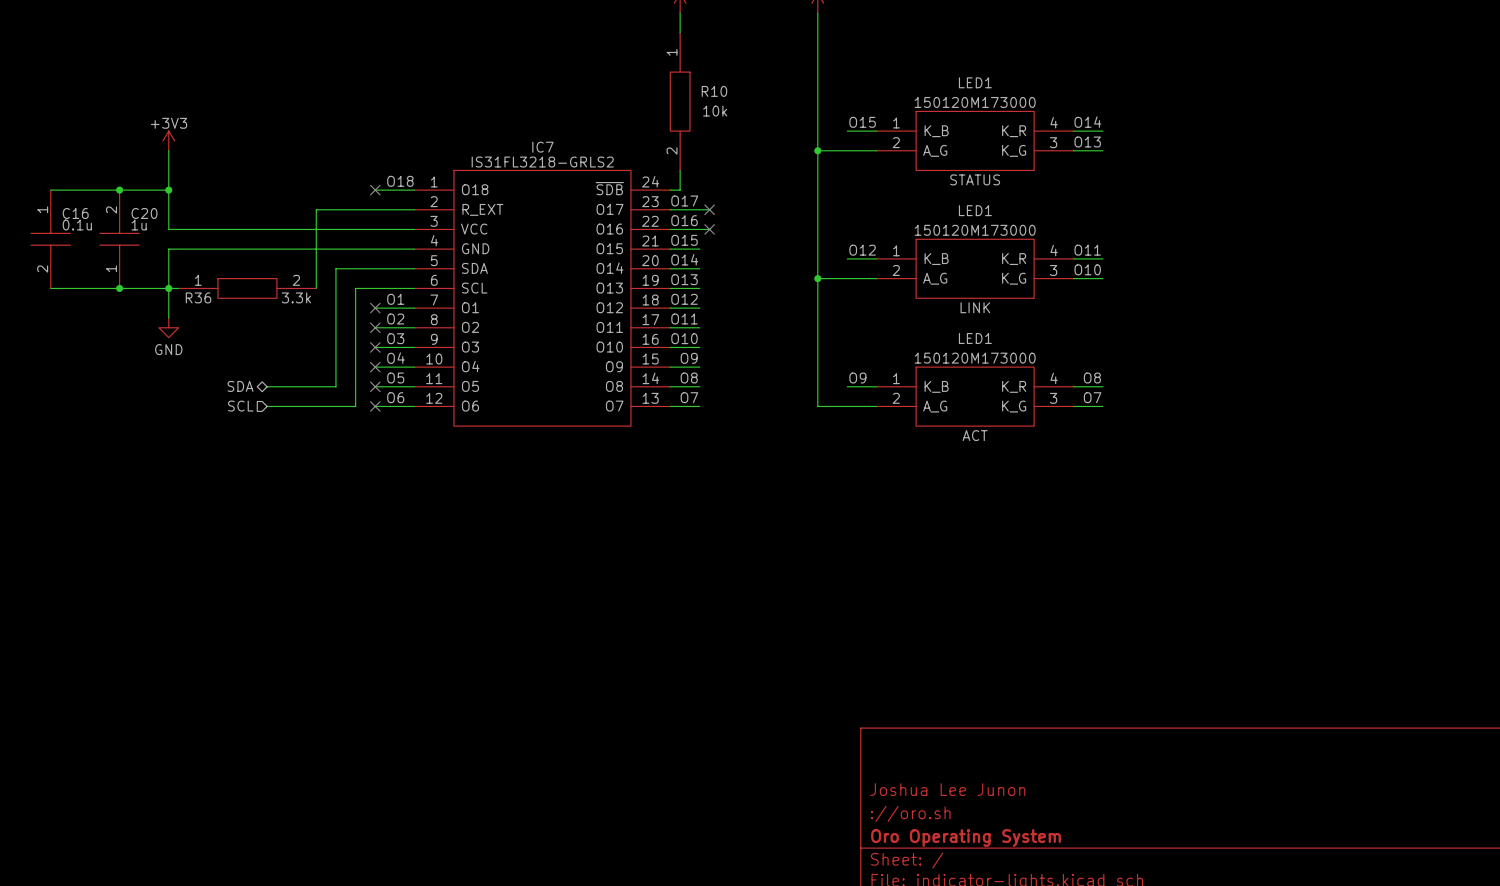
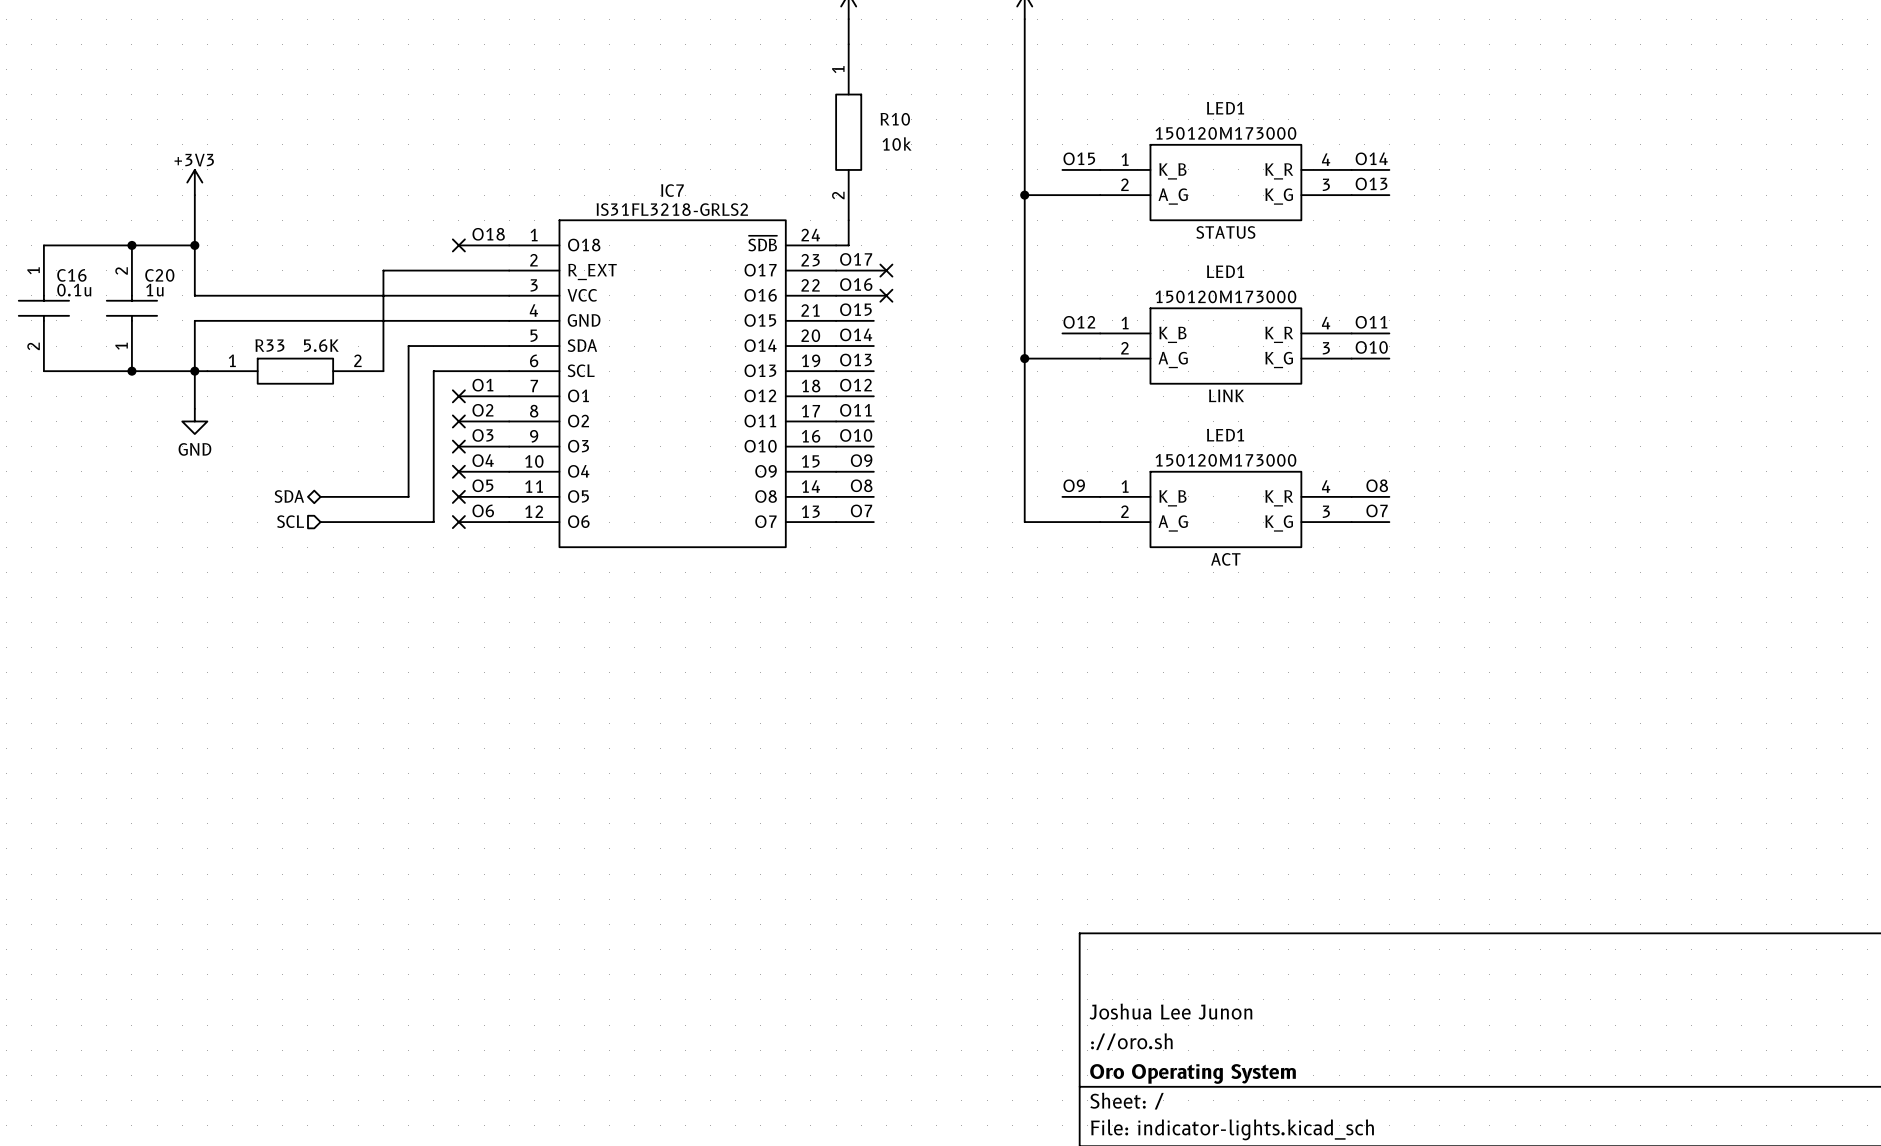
R36 name: R36 (198, 297) -> R33 (269, 345)
R36 value: 3.3k (296, 297) -> 5.6K (321, 345)

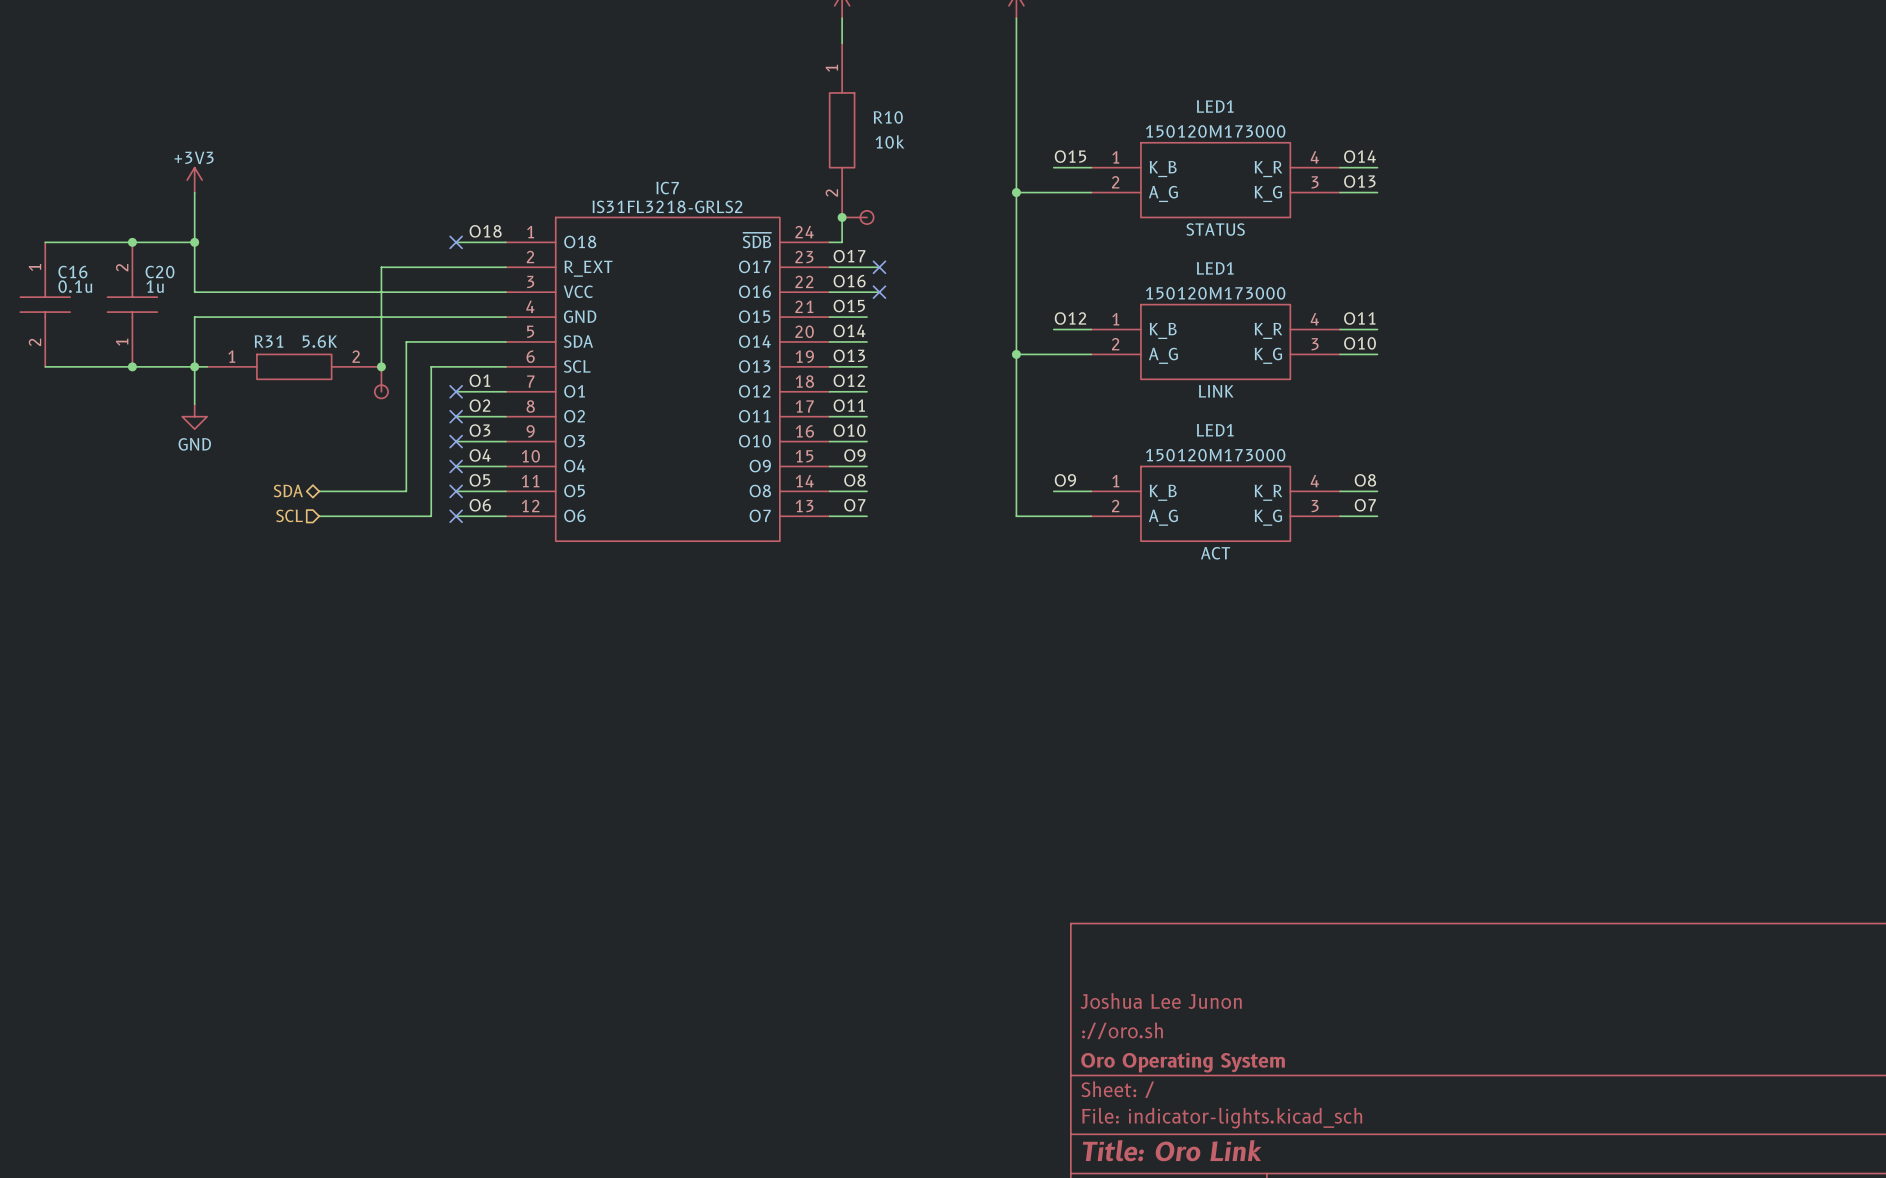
junction: none -> (842, 217)
part: none -> (857, 217)
R33 name: R33 (269, 345) -> R31 (268, 341)
junction: none -> (381, 366)
part: none -> (381, 382)

